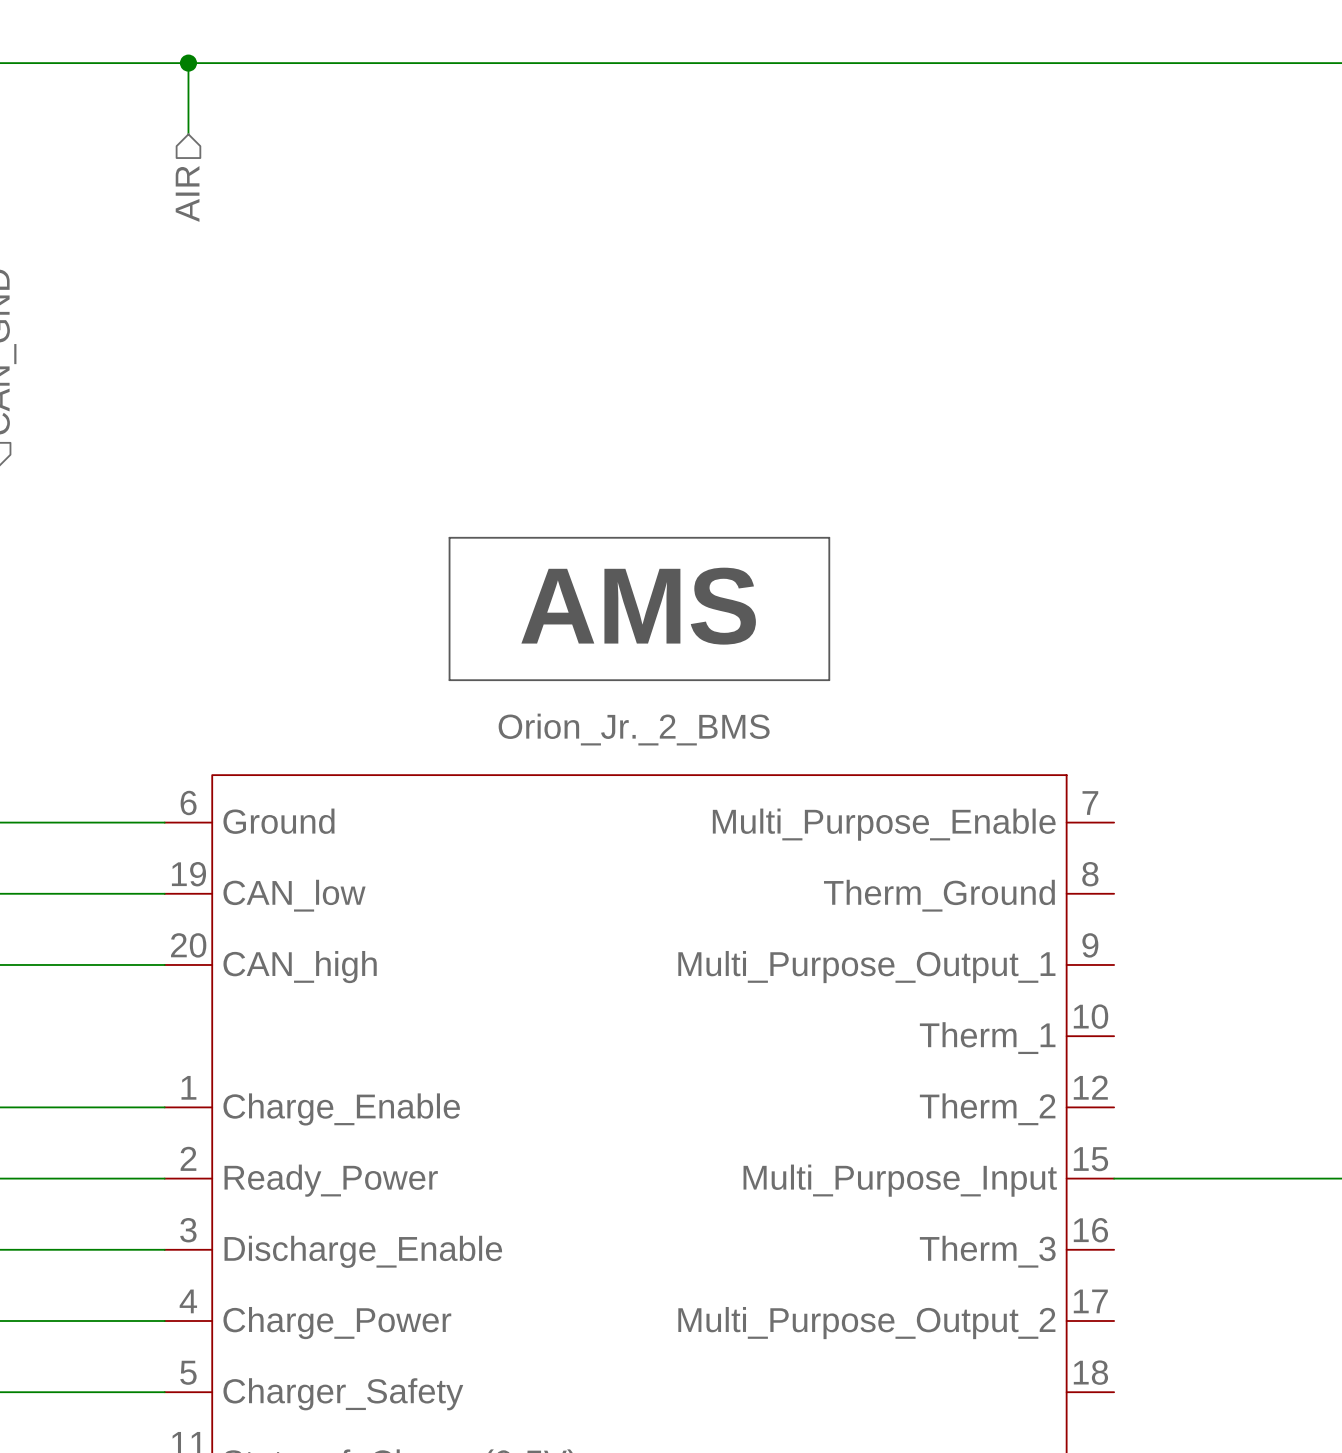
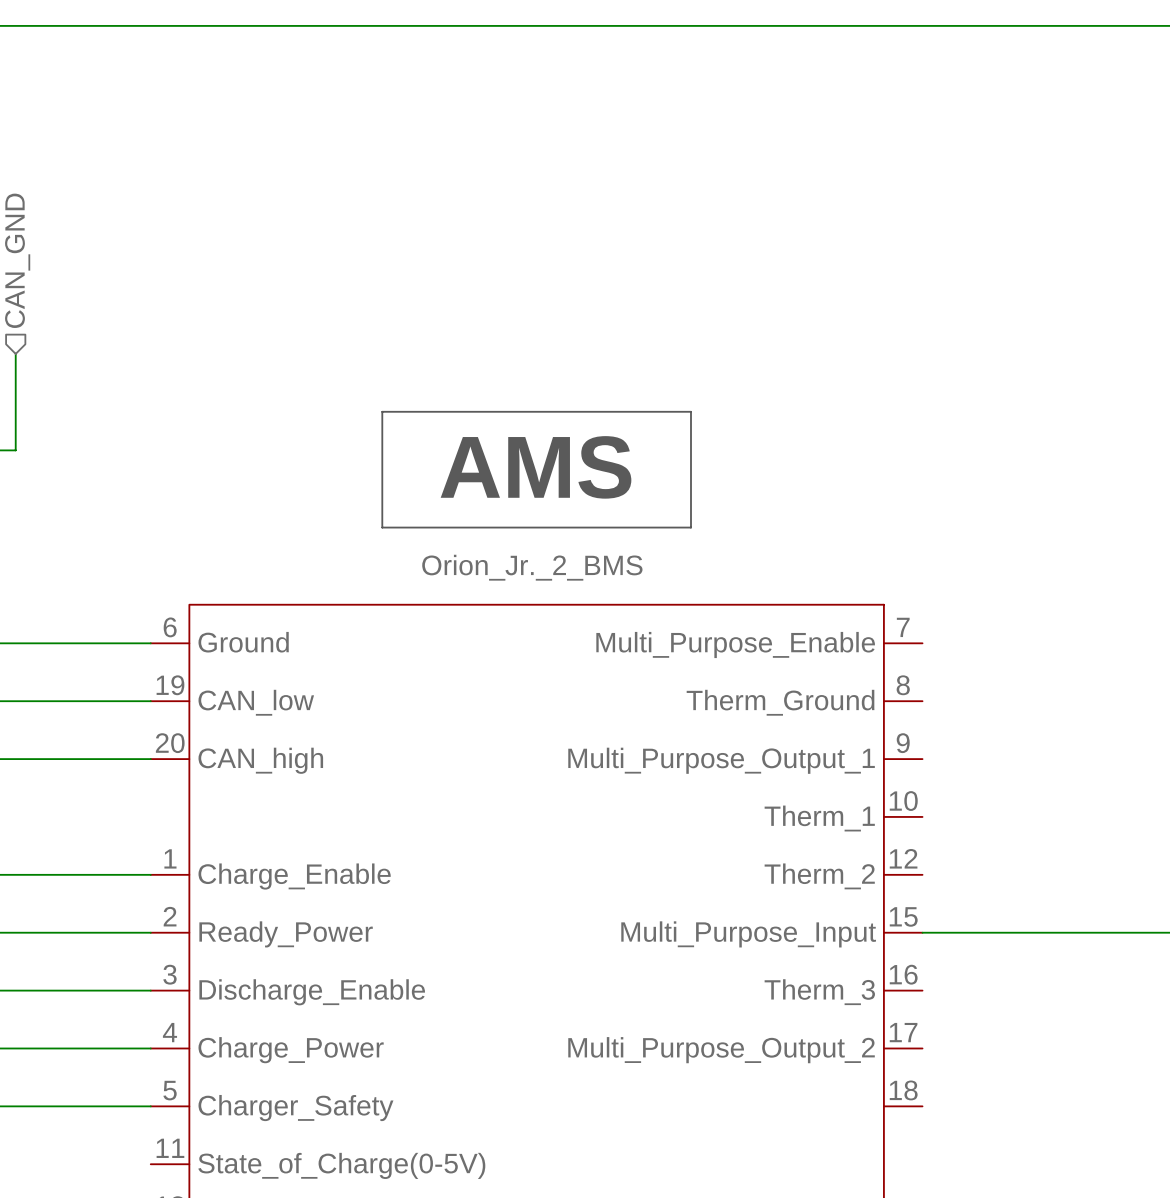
wire: (188, 63) (188, 134) -> none
junction: (188, 63) -> none
hierarchical label: AIR (187, 193) -> none

